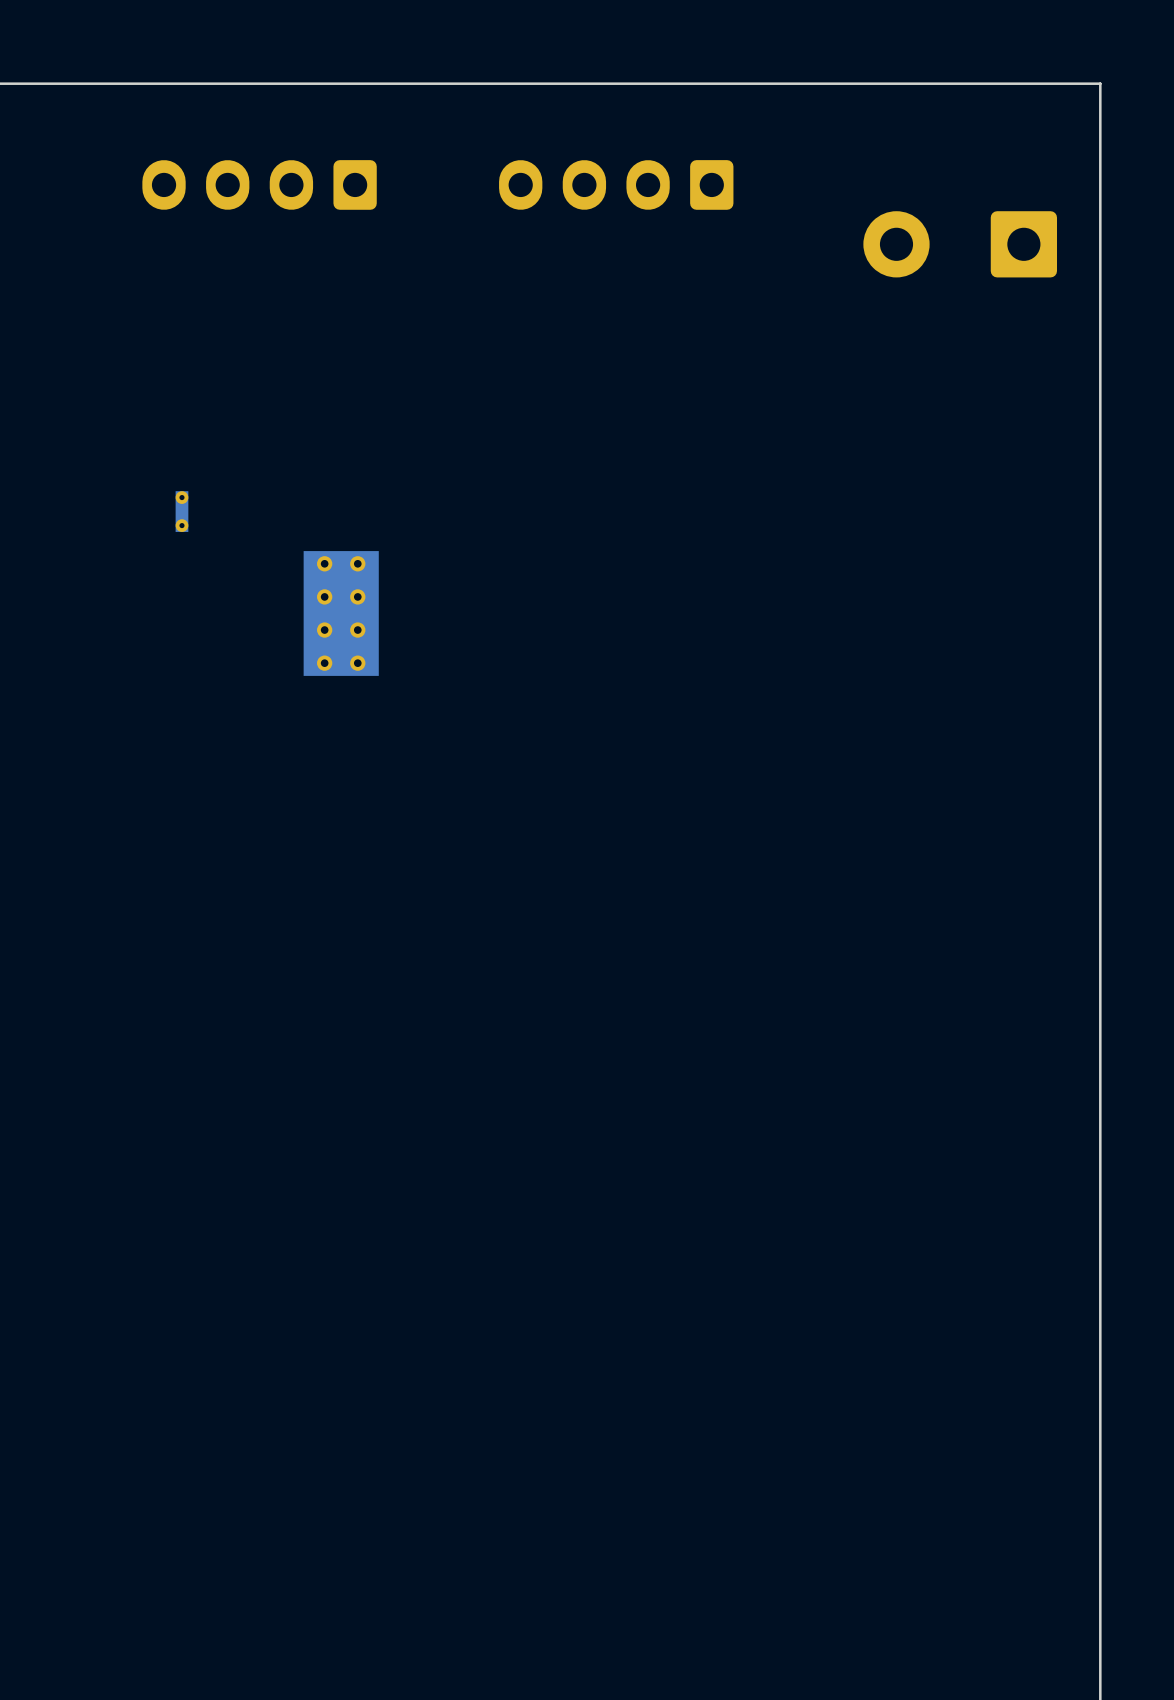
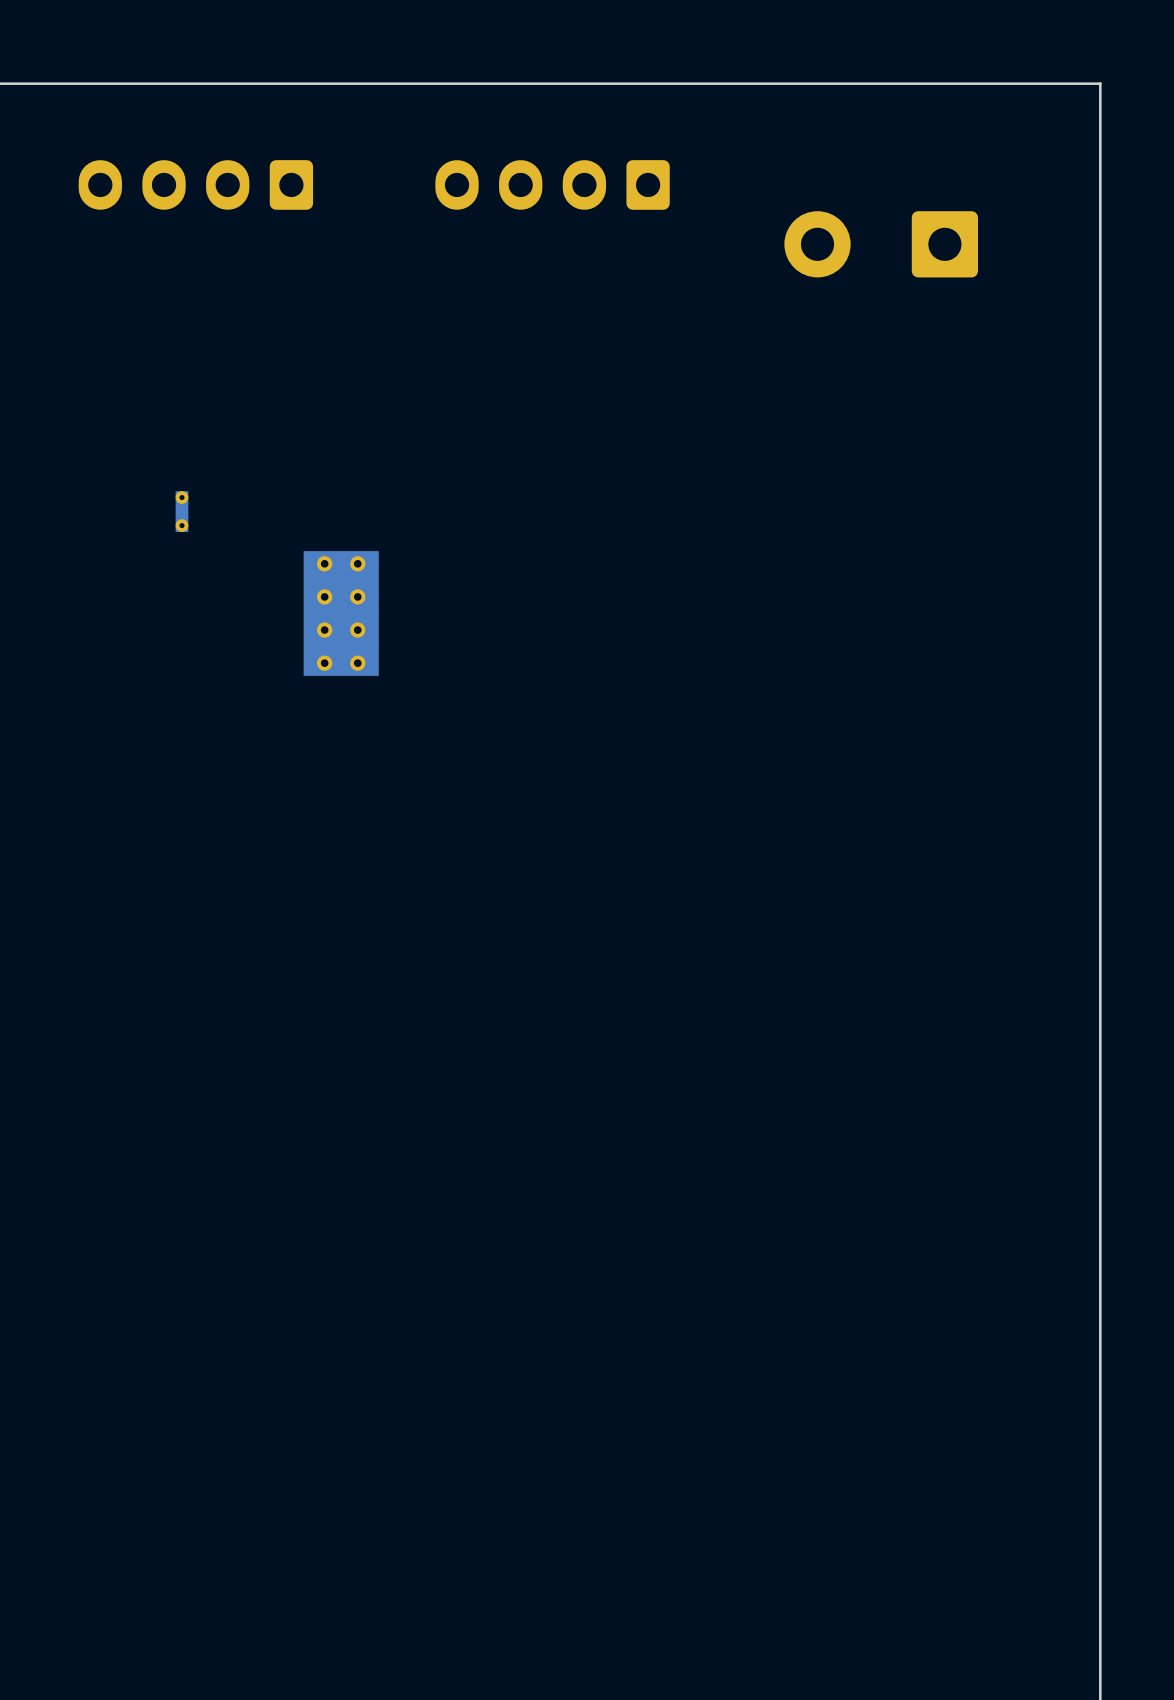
part position: (259, 184) -> (195, 184)
part position: (616, 184) -> (552, 184)
part position: (960, 244) -> (881, 244)

